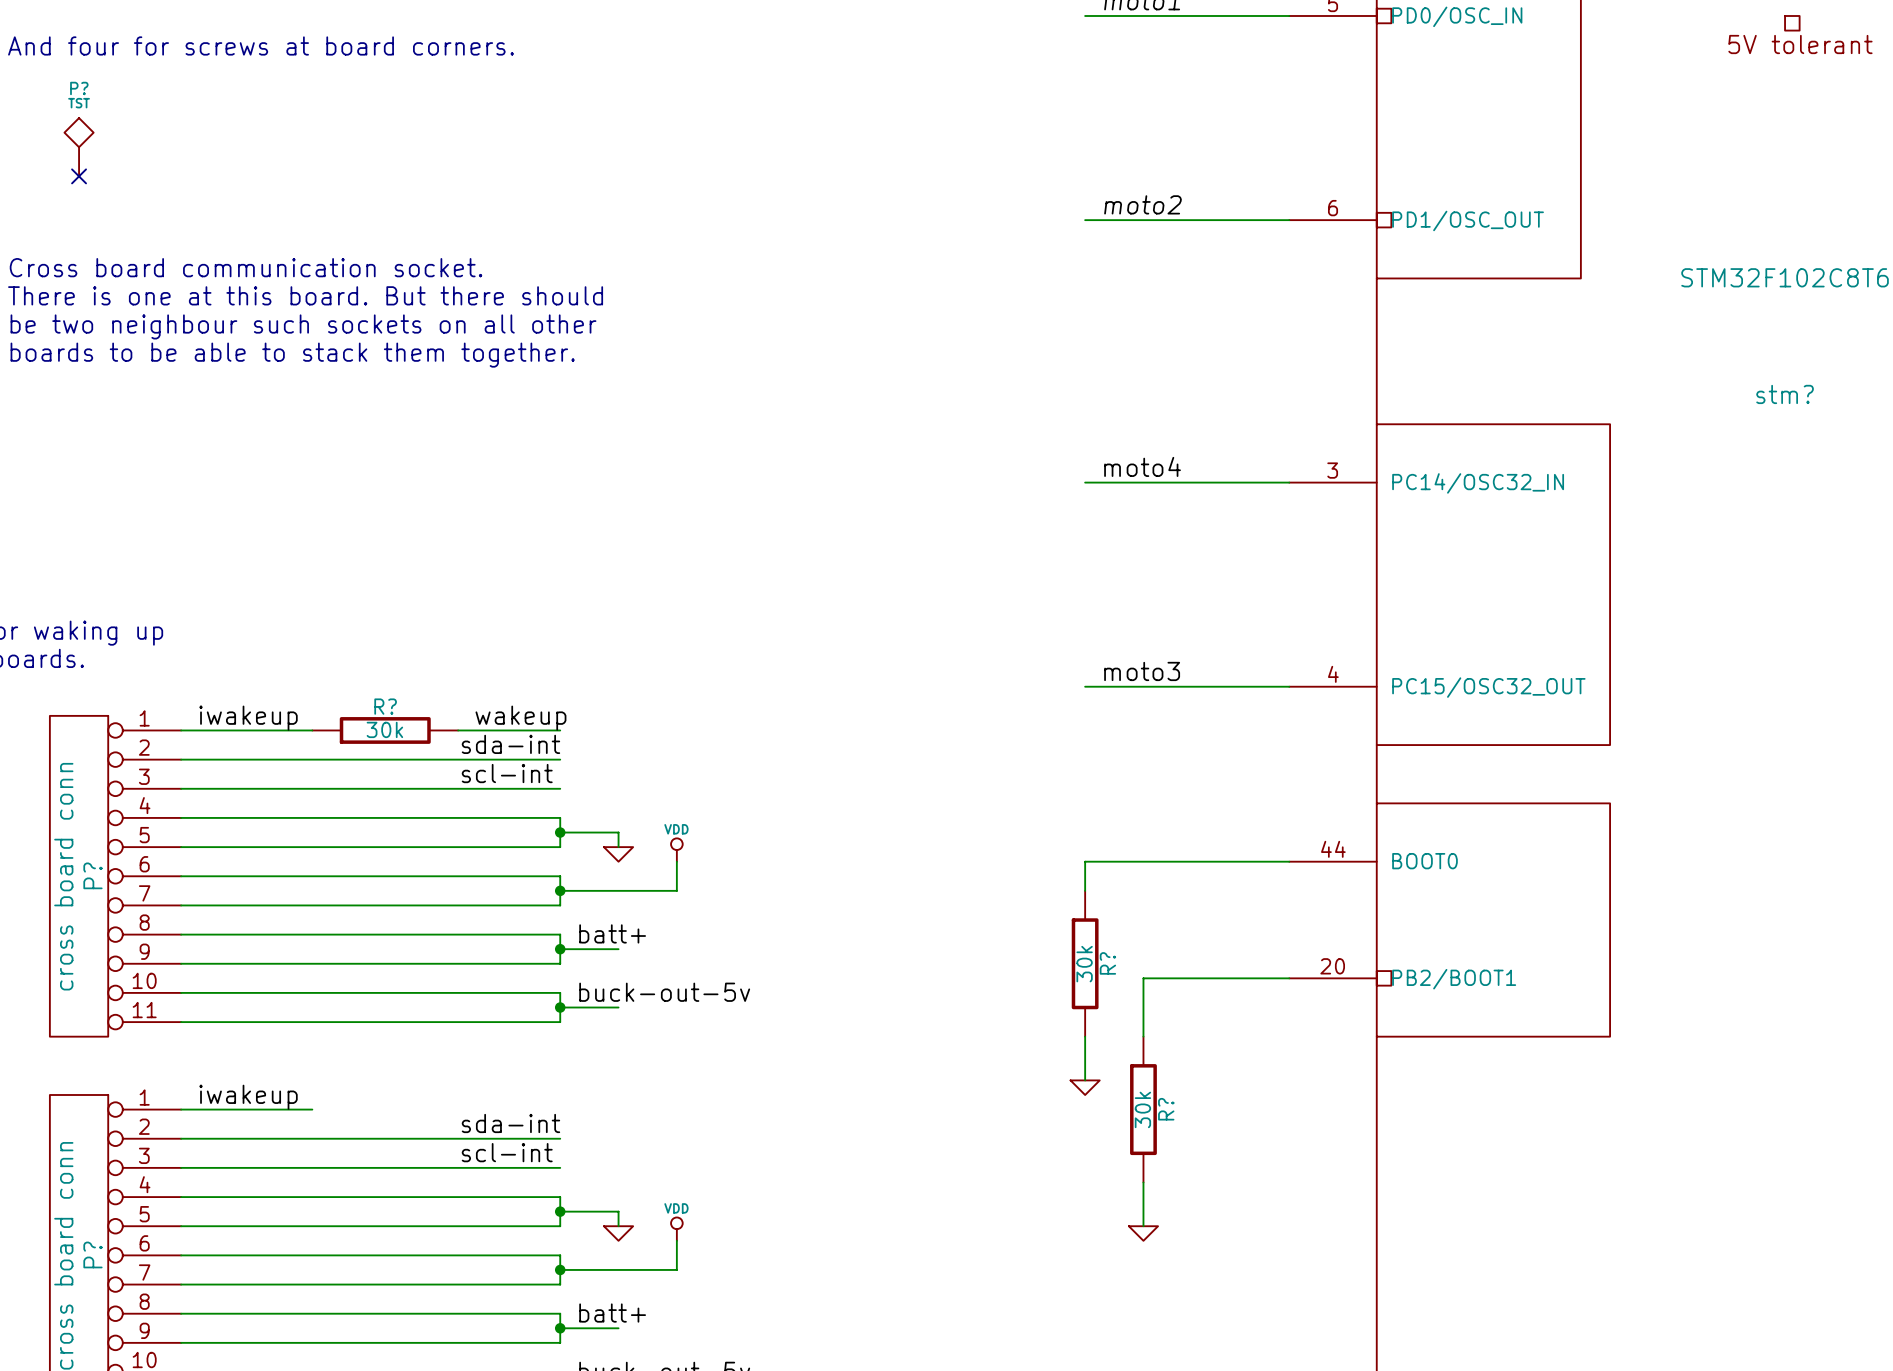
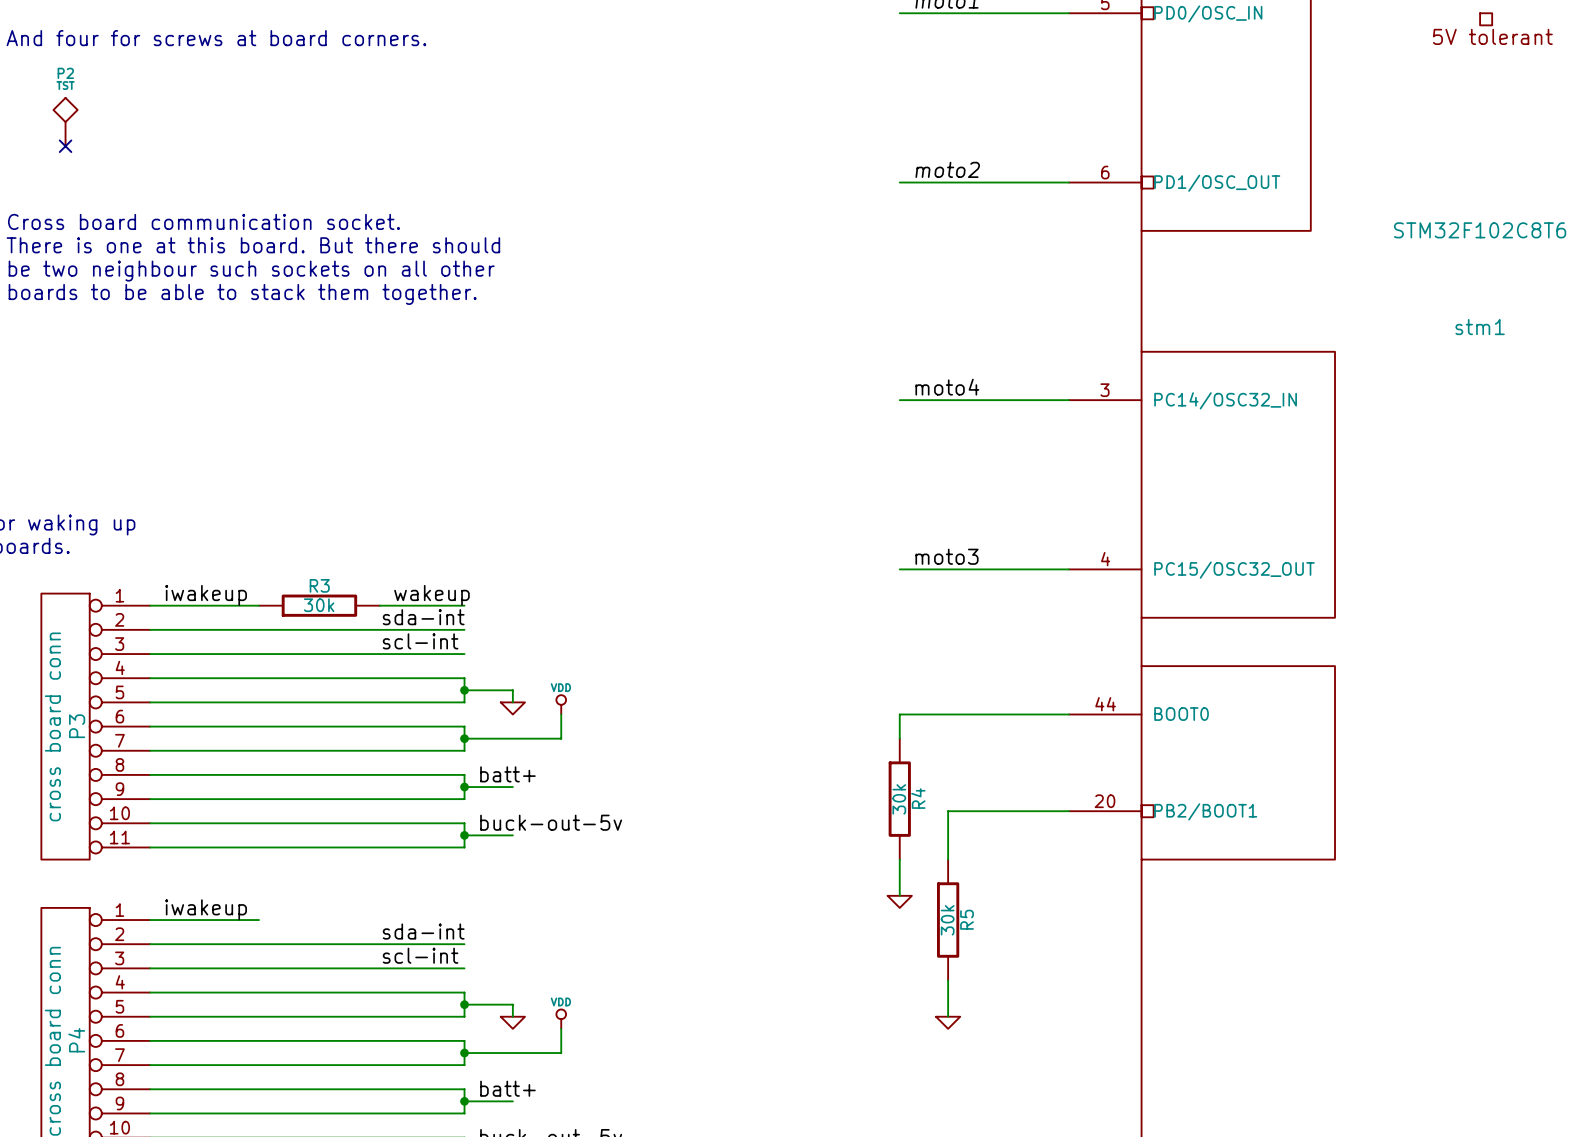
P? name: P? (79, 88) -> P2 (65, 73)
stm? name: stm? (1785, 394) -> stm1 (1480, 327)
R? name: R? (385, 706) -> R3 (319, 585)
P? name: P? (92, 875) -> P3 (77, 726)
R? name: R? (1107, 963) -> R4 (918, 798)
R? name: R? (1166, 1109) -> R5 (967, 919)
P? name: P? (92, 1254) -> P4 (76, 1040)

